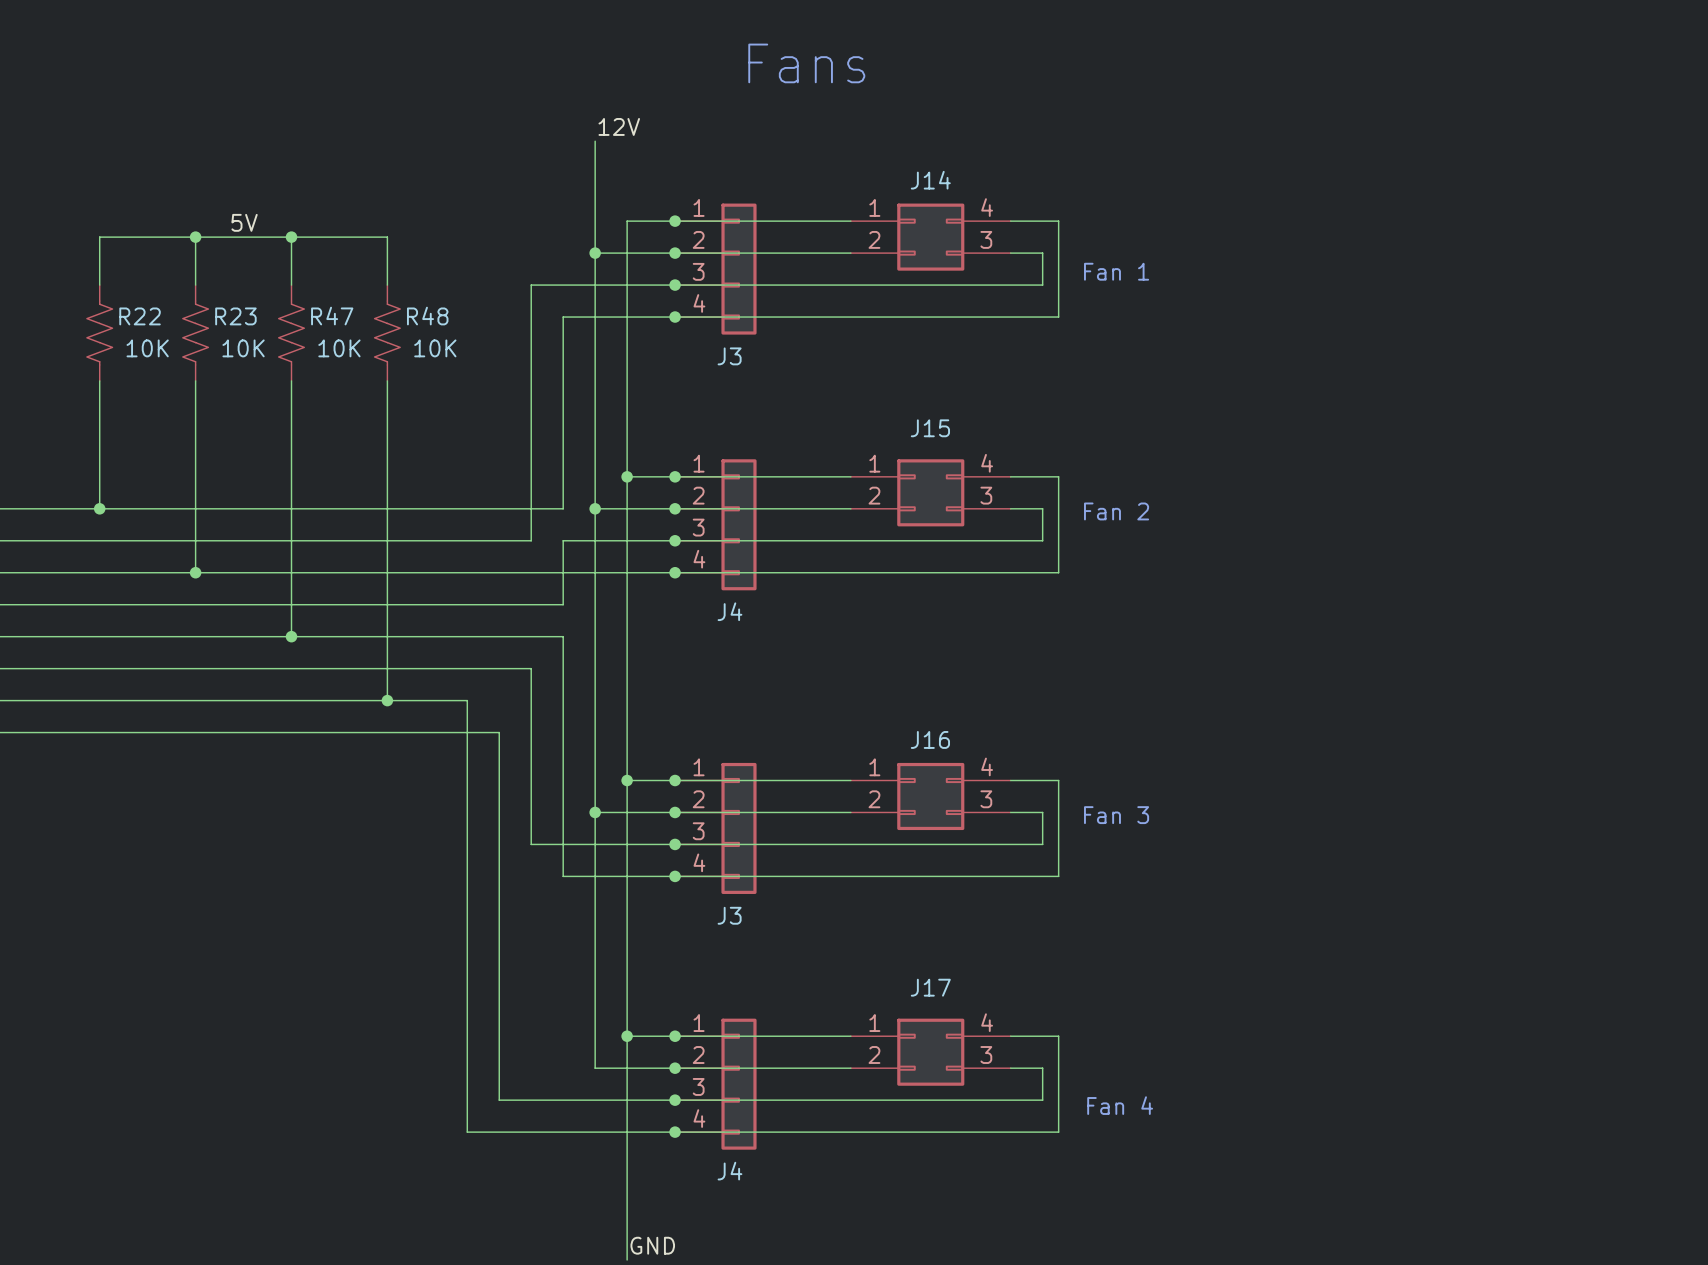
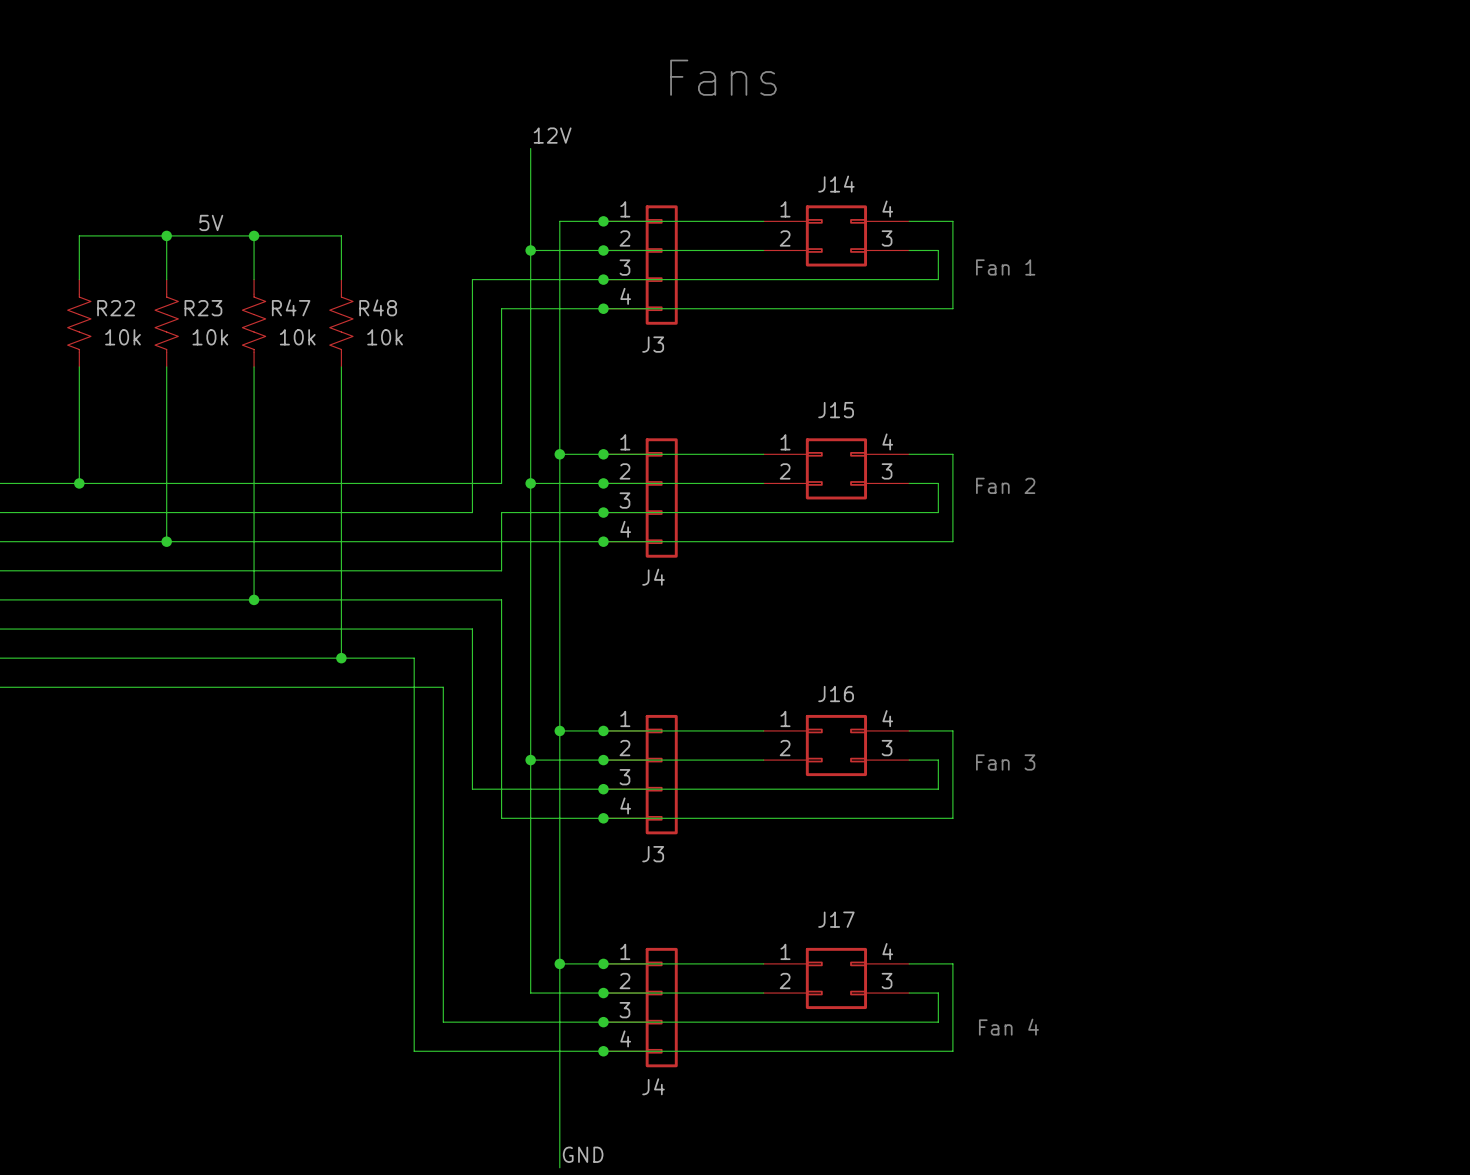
R22 value: 10K (147, 348) -> 10k (123, 337)
R23 value: 10K (243, 348) -> 10k (210, 337)
R47 value: 10K (339, 348) -> 10k (297, 337)
R48 value: 10K (435, 348) -> 10k (385, 337)

